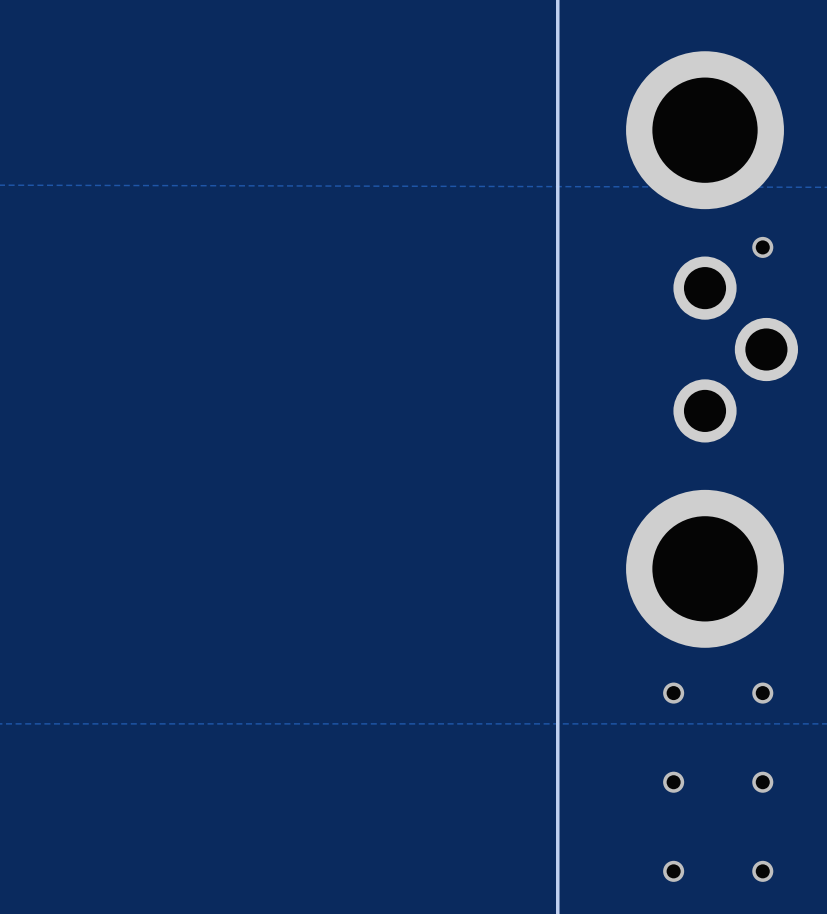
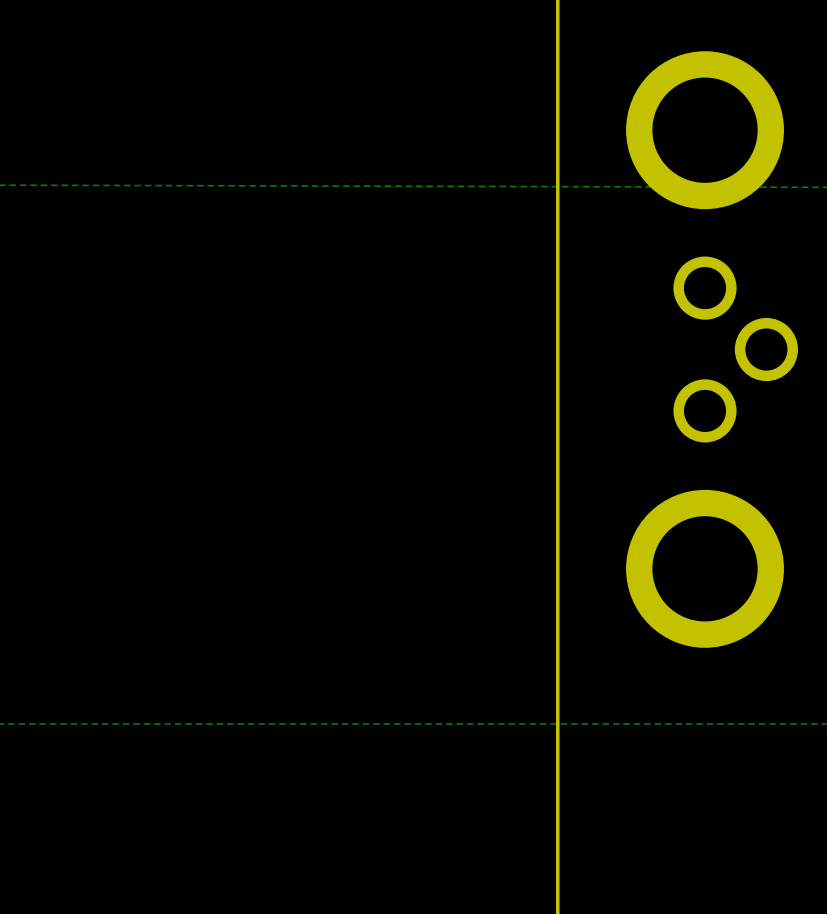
via: (762, 247) -> none
via: (673, 693) -> none
via: (762, 693) -> none
via: (673, 782) -> none
via: (762, 782) -> none
via: (673, 871) -> none
via: (762, 871) -> none

